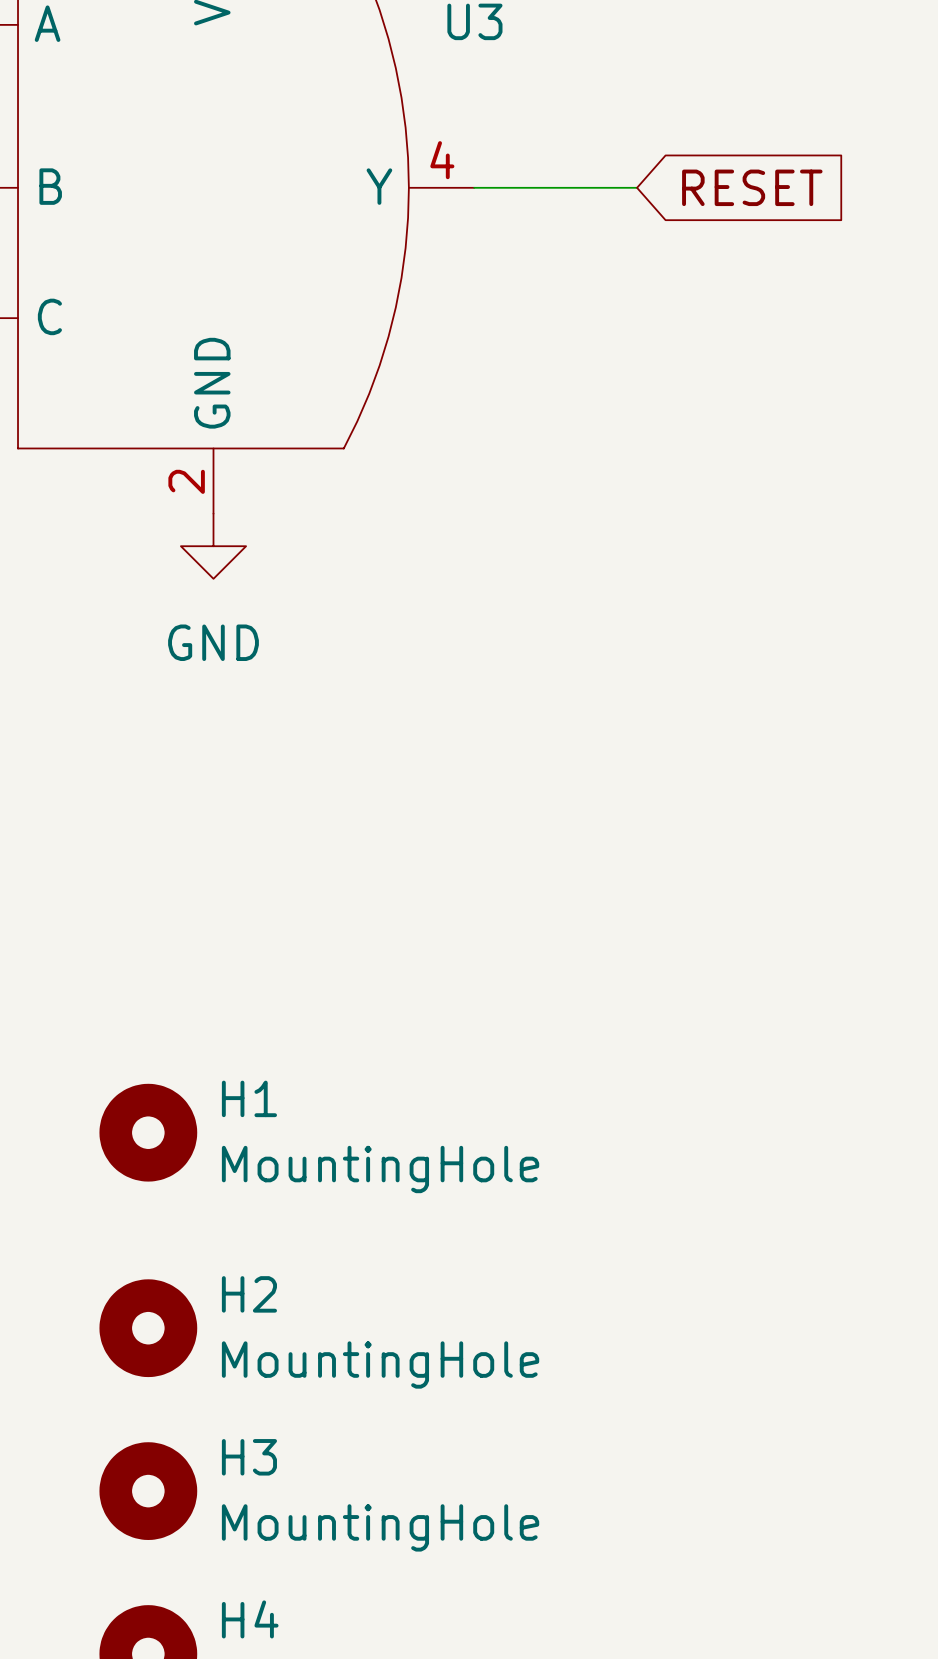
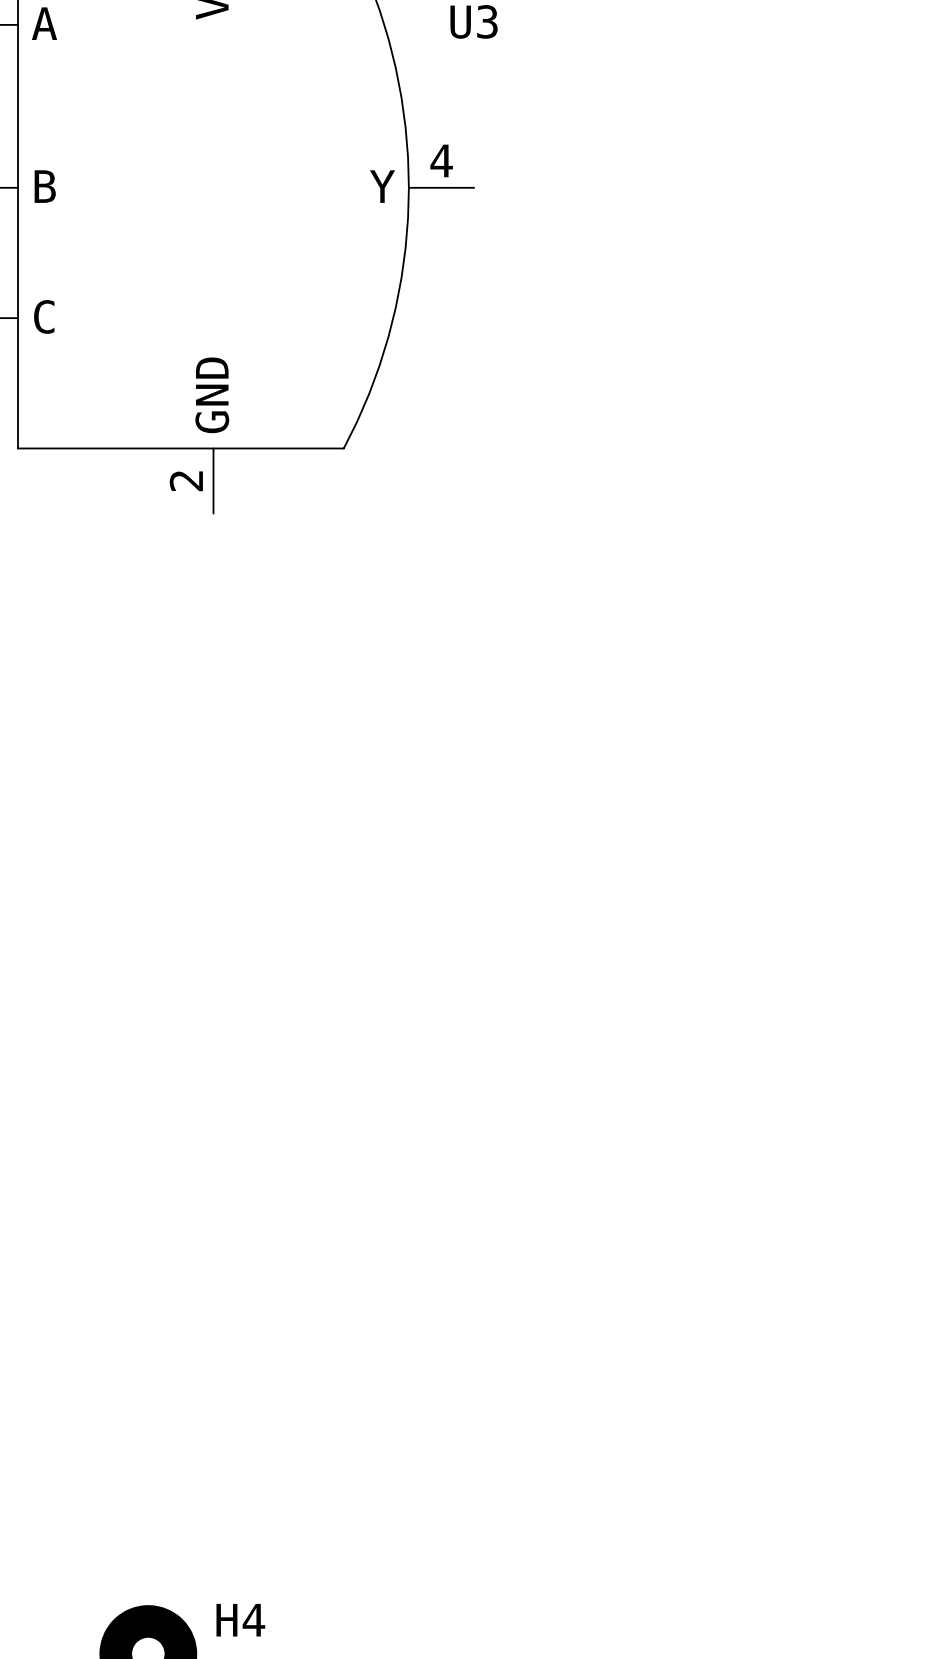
wire: (474, 187) (637, 187) -> none
global label: RESET (752, 187) -> none
power symbol: GND (213, 546) -> none
H1: MountingHole (148, 1132) -> none
H2: MountingHole (148, 1328) -> none
H3: MountingHole (148, 1491) -> none

